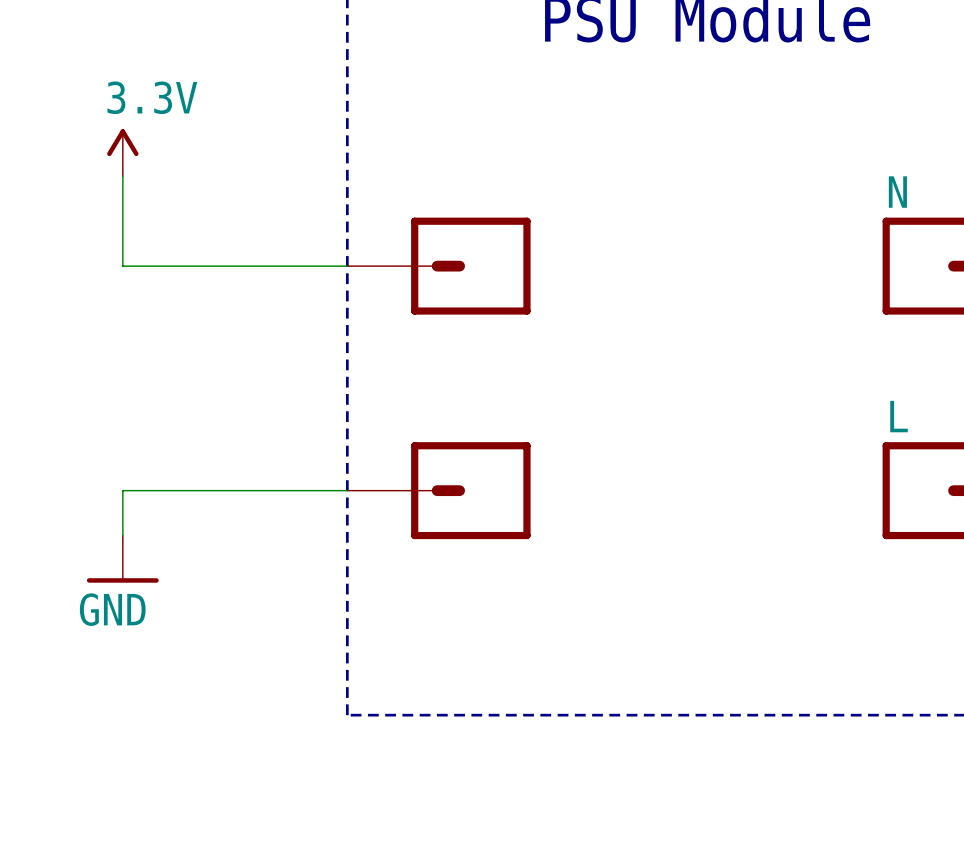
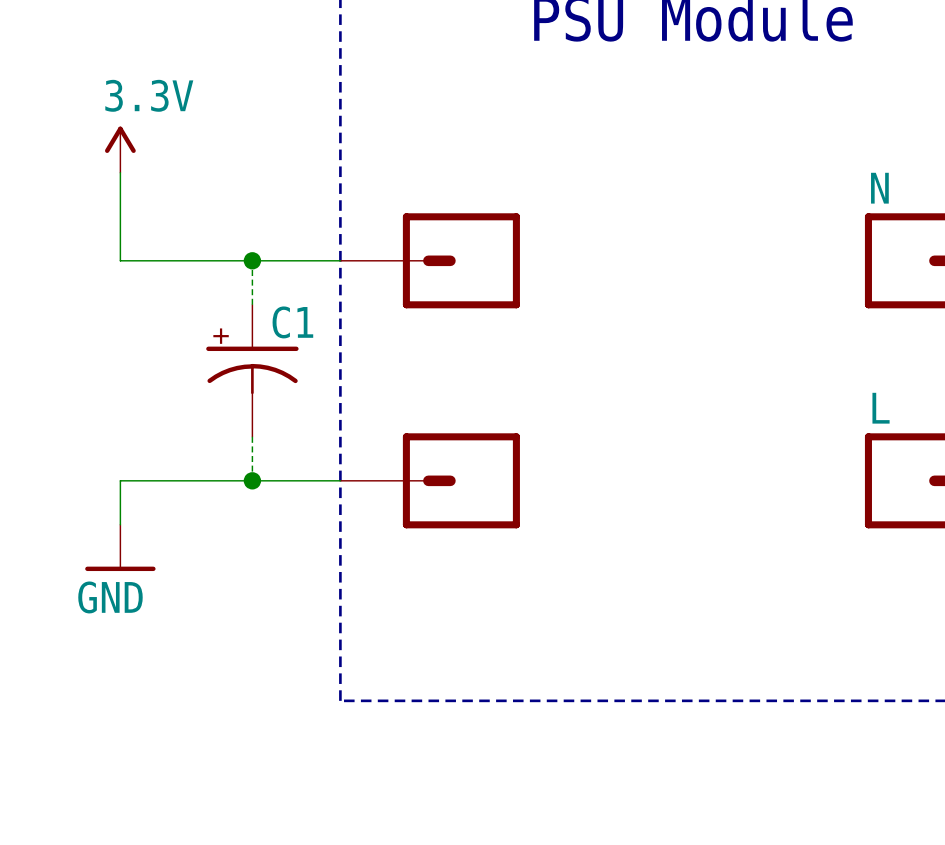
wire: none -> (252, 260) (252, 304)
junction: none -> (252, 260)
C1: none -> (252, 370)
wire: none -> (252, 436) (252, 480)
junction: none -> (252, 480)

